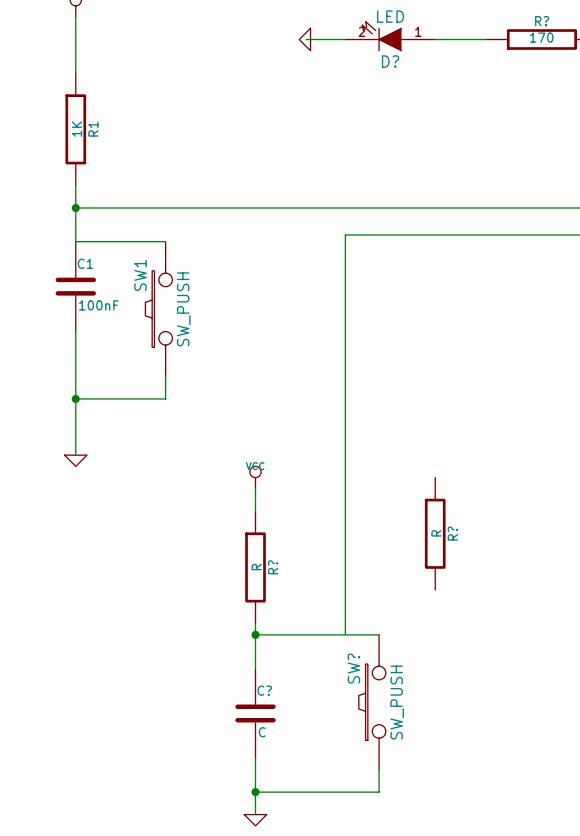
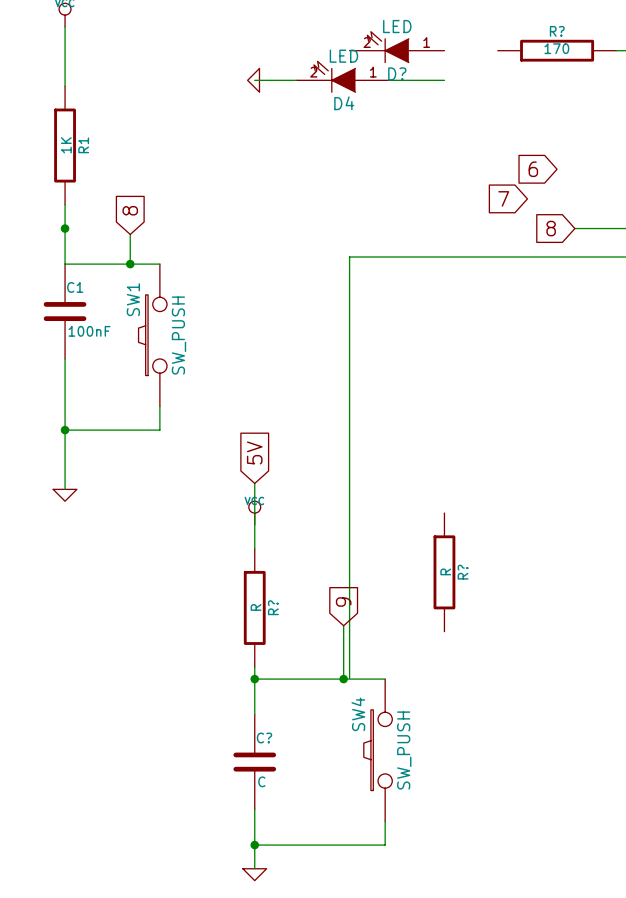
power symbol: (304, 39) -> none
wire: (306, 39) (345, 39) -> (254, 80) (296, 80)
wire: (435, 39) (485, 39) -> (391, 80) (444, 80)
D4: none -> LED (343, 76)
power symbol: none -> (253, 80)
global label: none -> 6 (533, 169)
global label: none -> 7 (503, 198)
global label: none -> 8 (130, 210)
wire: (75, 208) (558, 208) -> none
global label: none -> 8 (551, 228)
wire: none -> (130, 234) (130, 264)
junction: none -> (130, 264)
global label: none -> 5V (254, 452)
wire: none -> (254, 483) (254, 524)
global label: none -> 9 (343, 602)
wire: none -> (343, 625) (343, 679)
junction: none -> (343, 679)
SW? name: SW? (353, 668) -> SW4 (358, 714)

